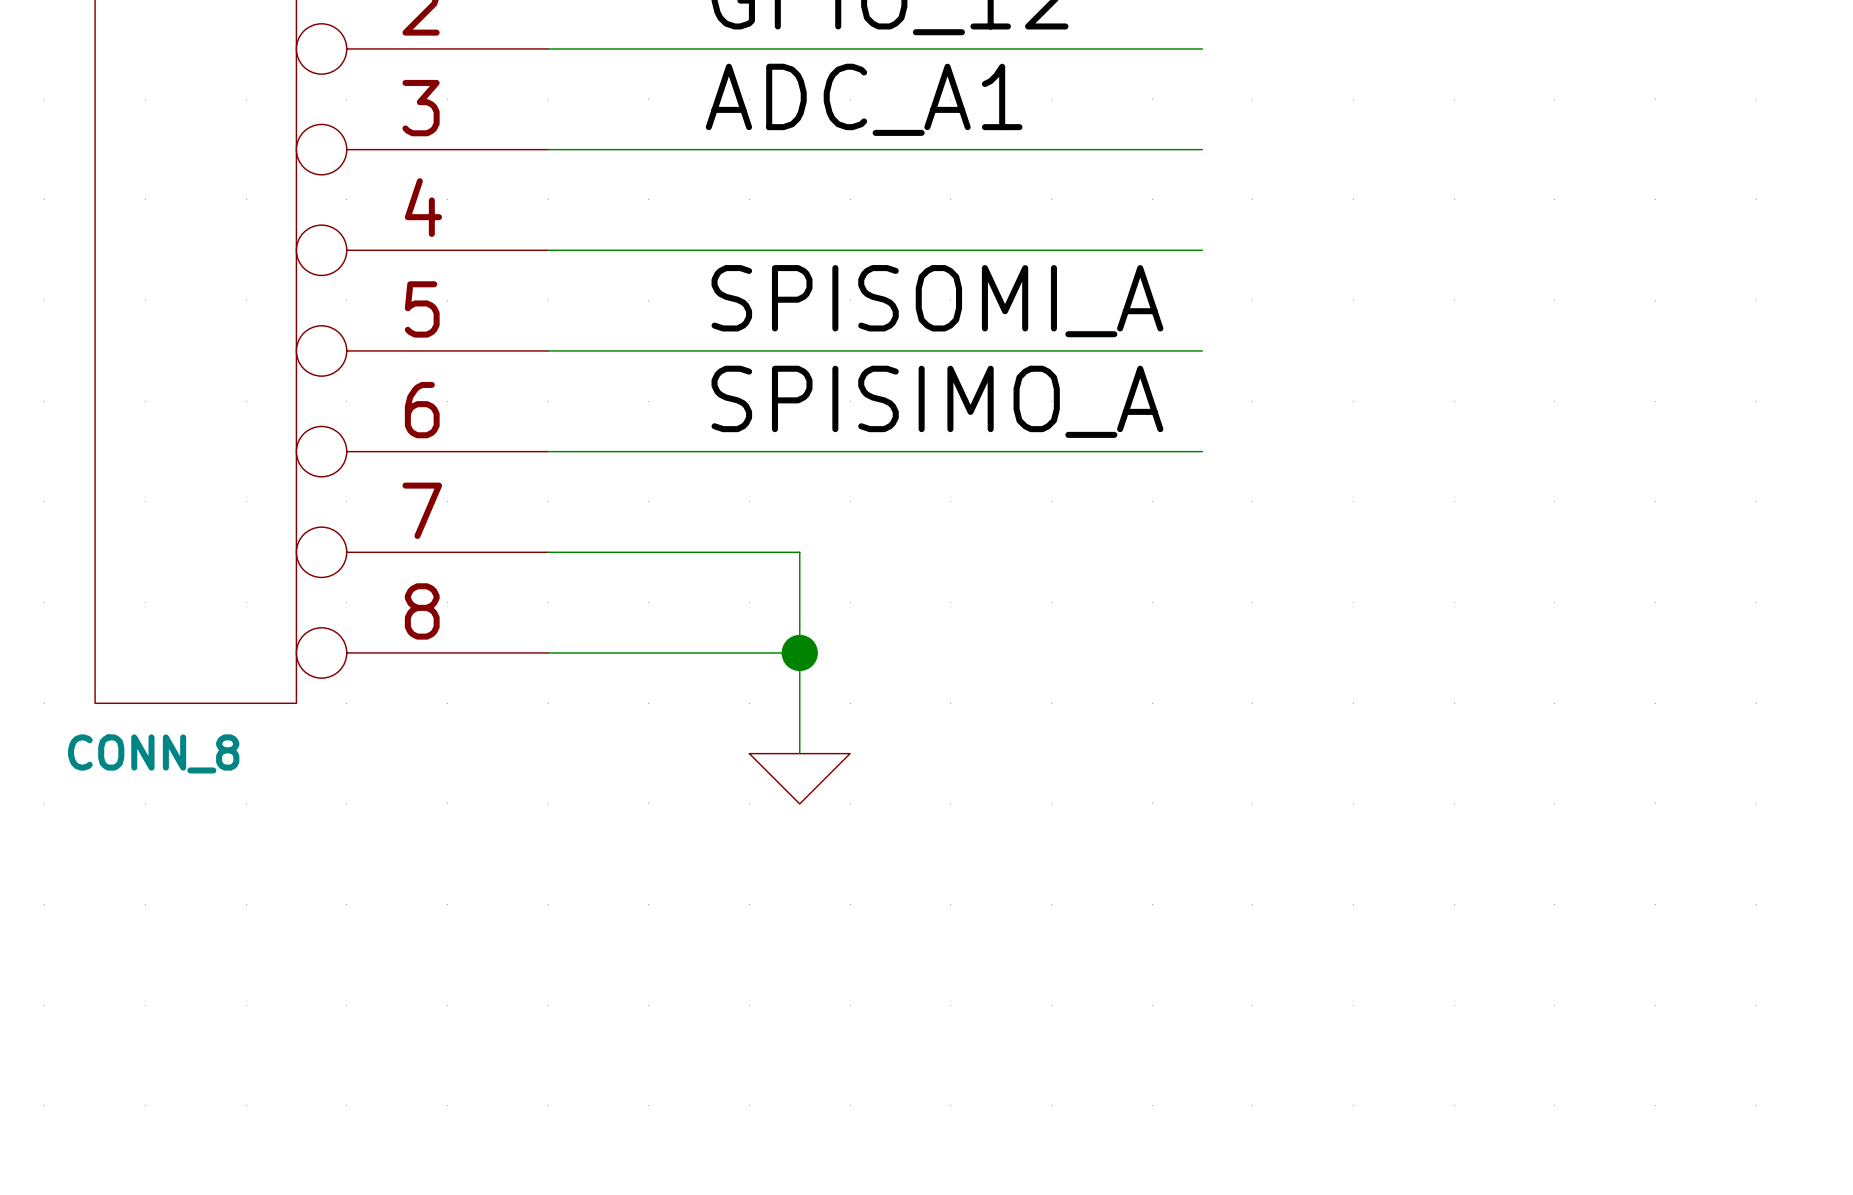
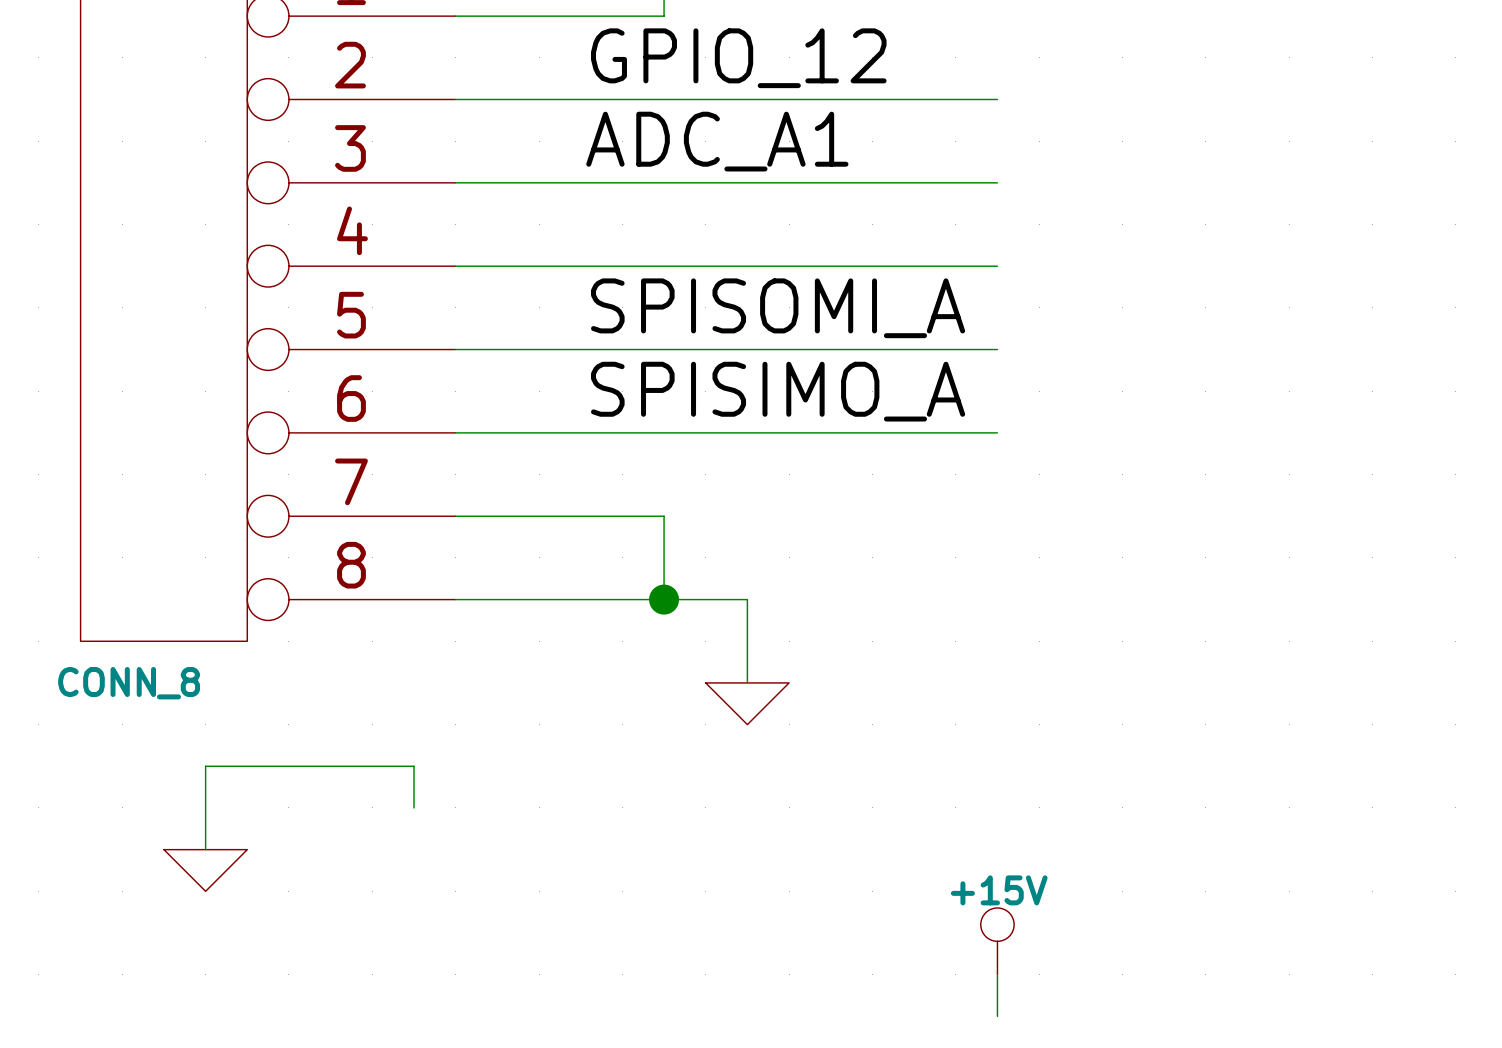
wire: (799, 652) (799, 753) -> (664, 599) (747, 599) (747, 682)
power symbol position: (799, 778) -> (747, 703)
wire: none -> (413, 807) (413, 766) (205, 766) (205, 849)
power symbol: none -> (205, 870)
power symbol: none -> +15V (997, 941)
wire: none -> (997, 974) (997, 1016)

